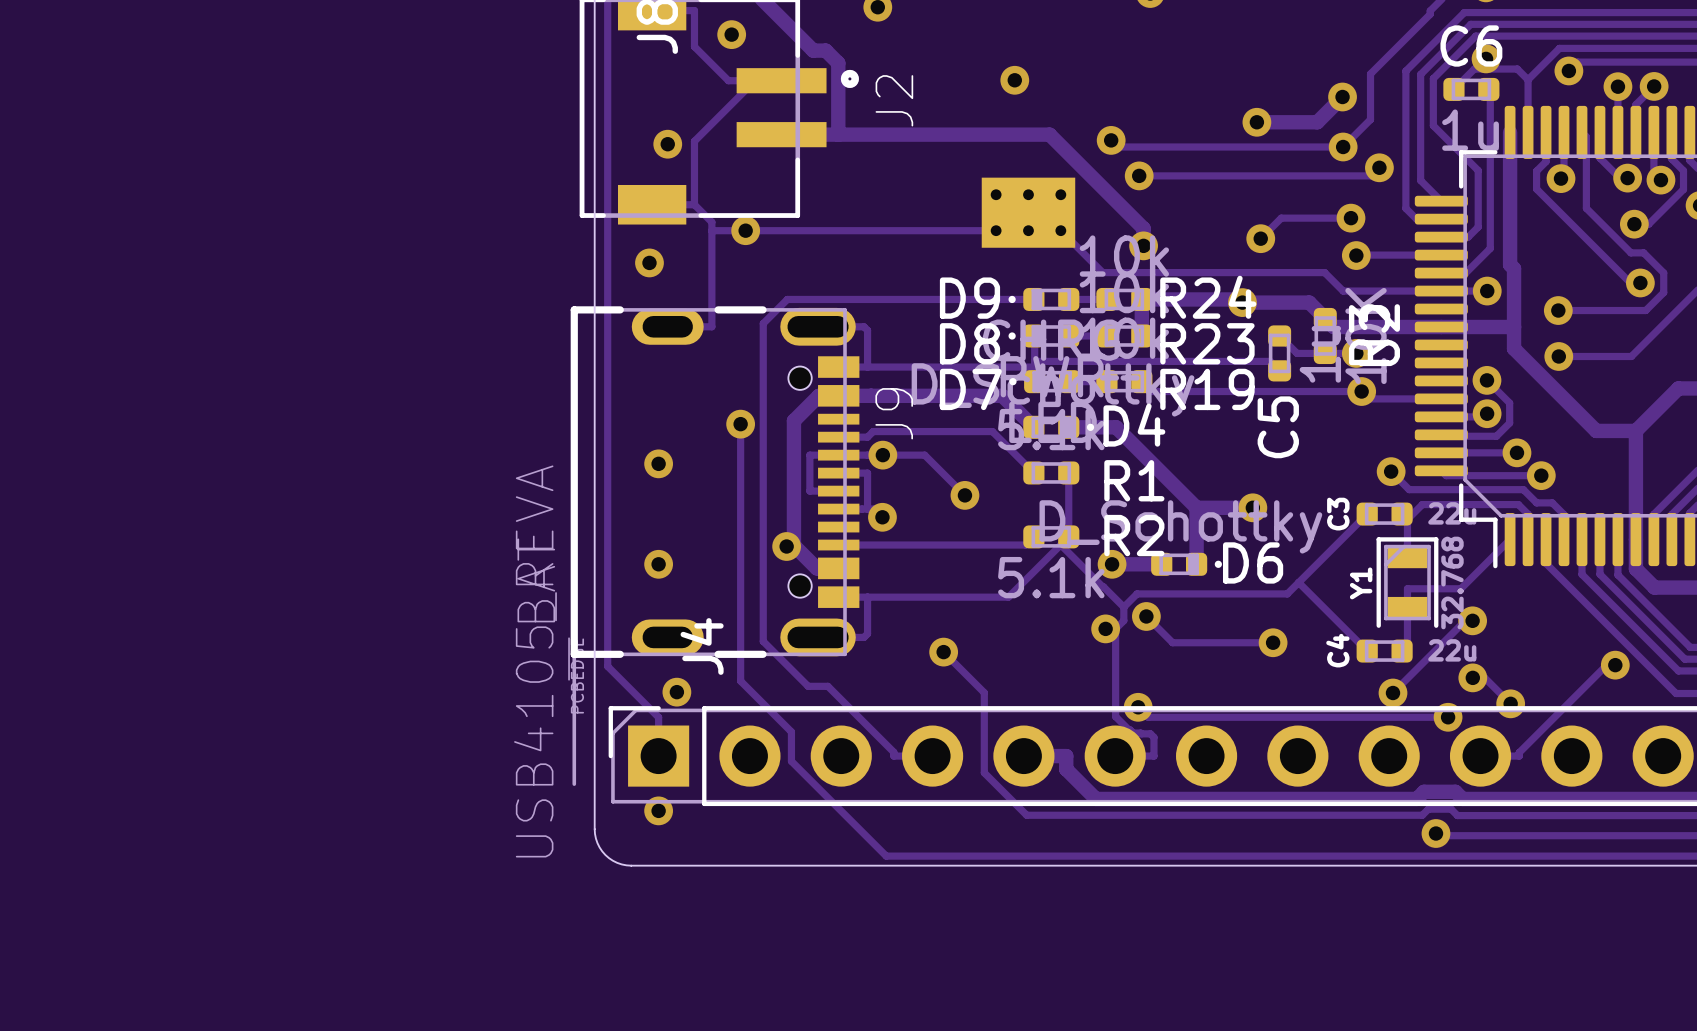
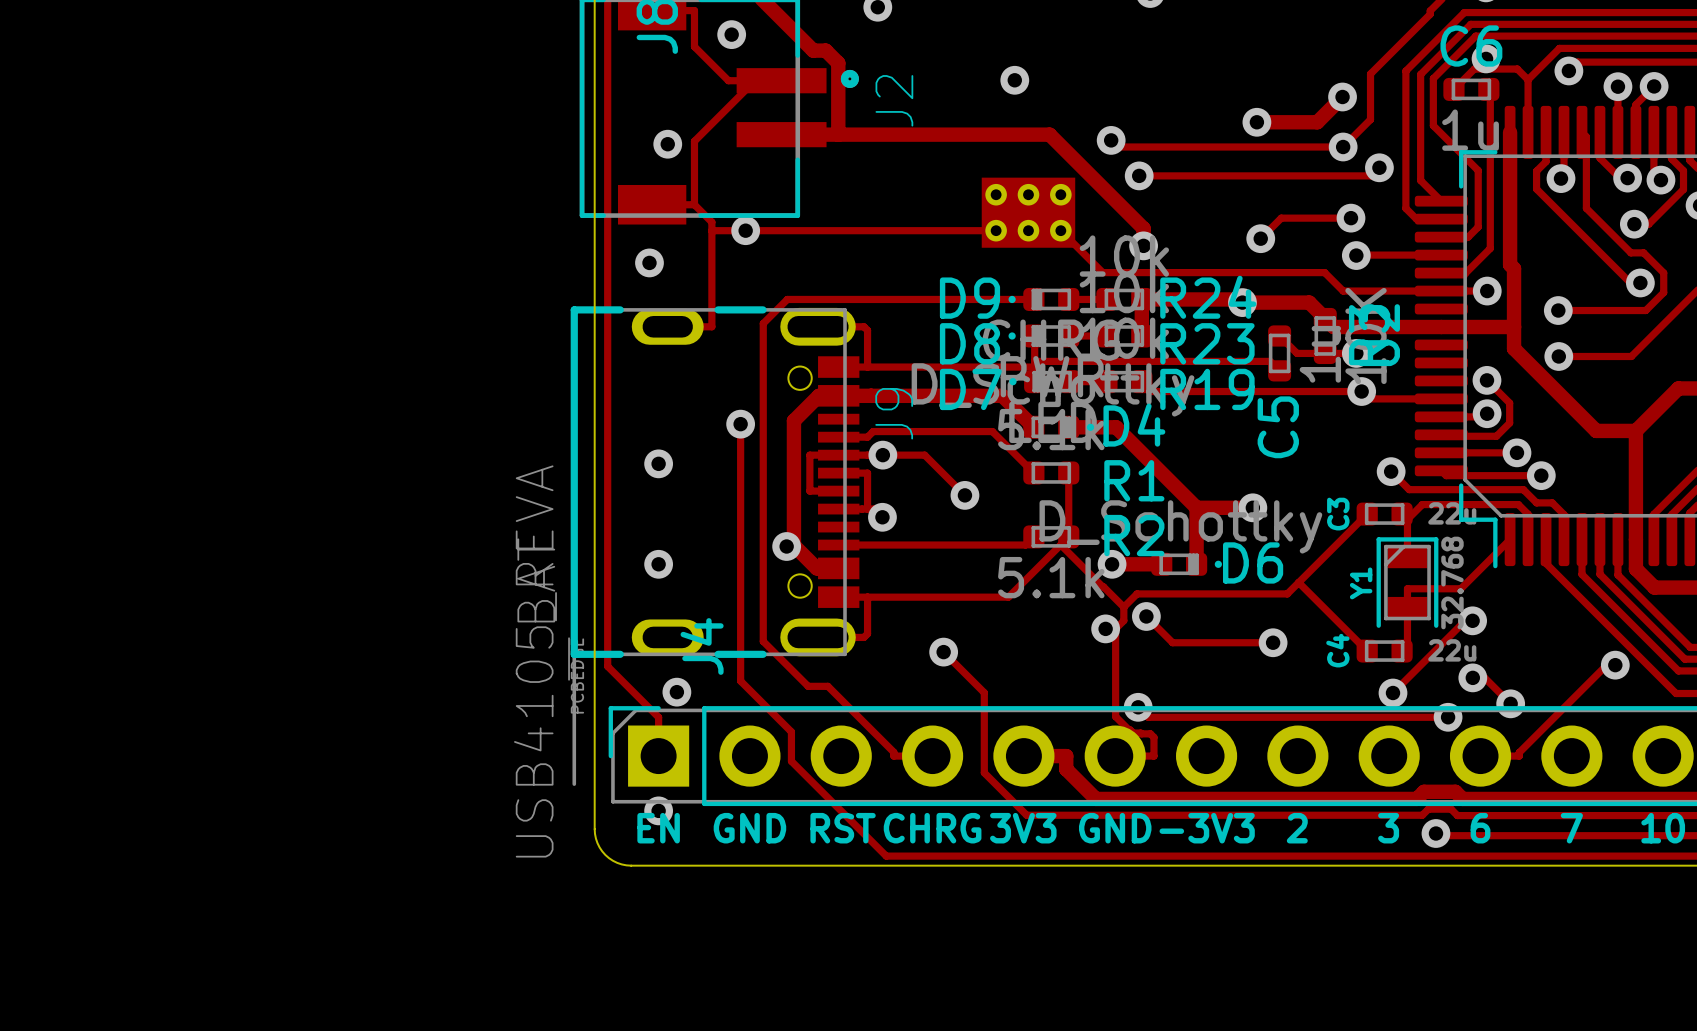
text: none -> EN (658, 828)
text: none -> GND (749, 828)
text: none -> RST (843, 828)
text: none -> CHRG (932, 828)
text: none -> 3V3 (1023, 828)
text: none -> GND (1115, 828)
text: none -> -3V3 (1207, 828)
text: none -> 2 (1297, 828)
text: none -> 3 (1388, 828)
text: none -> 6 (1480, 828)
text: none -> 7 (1571, 828)
text: none -> 10 (1663, 828)

